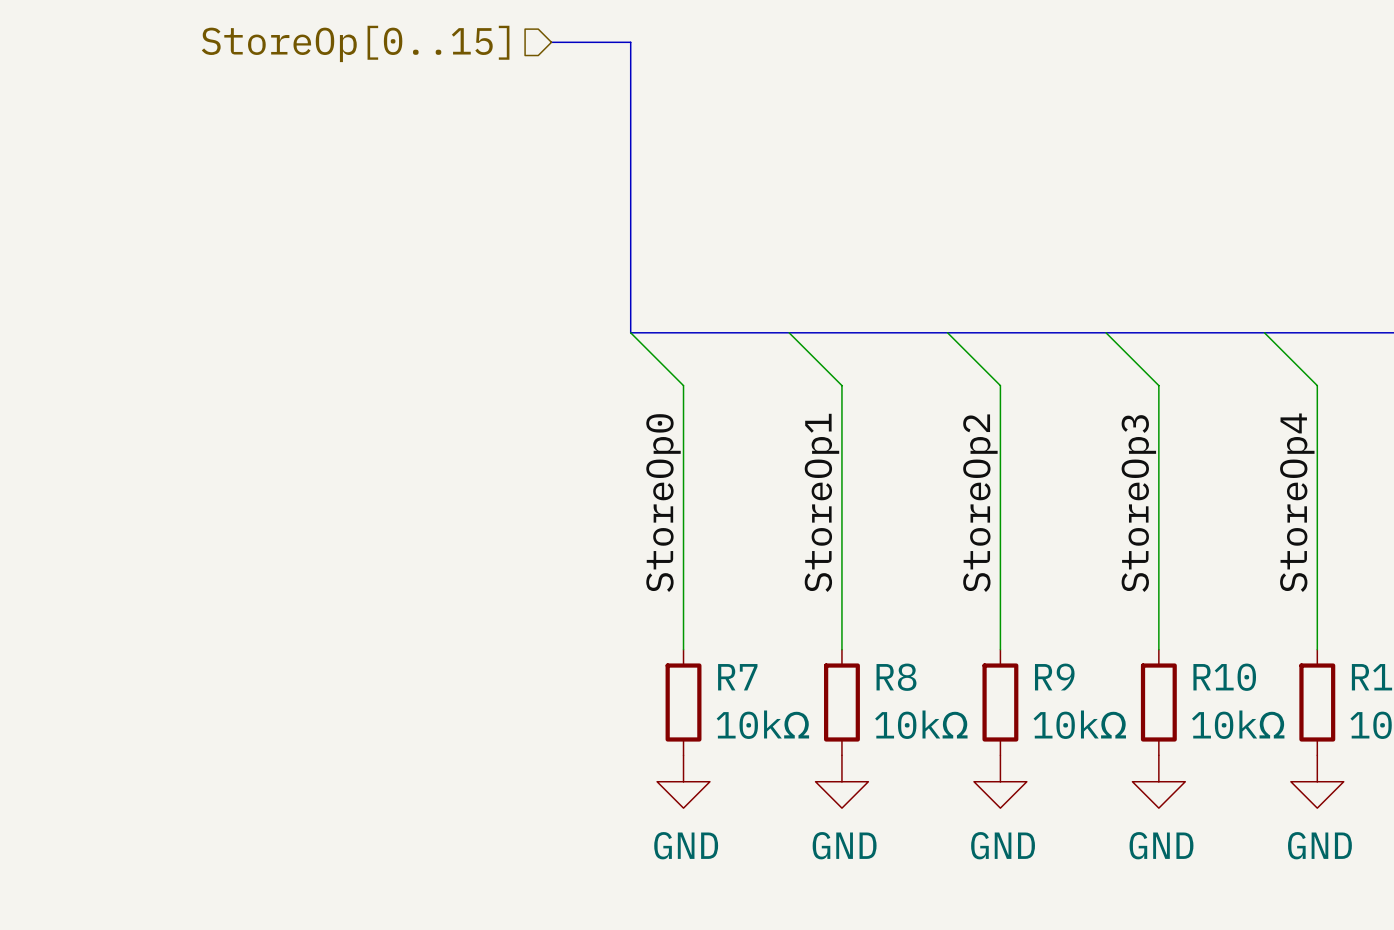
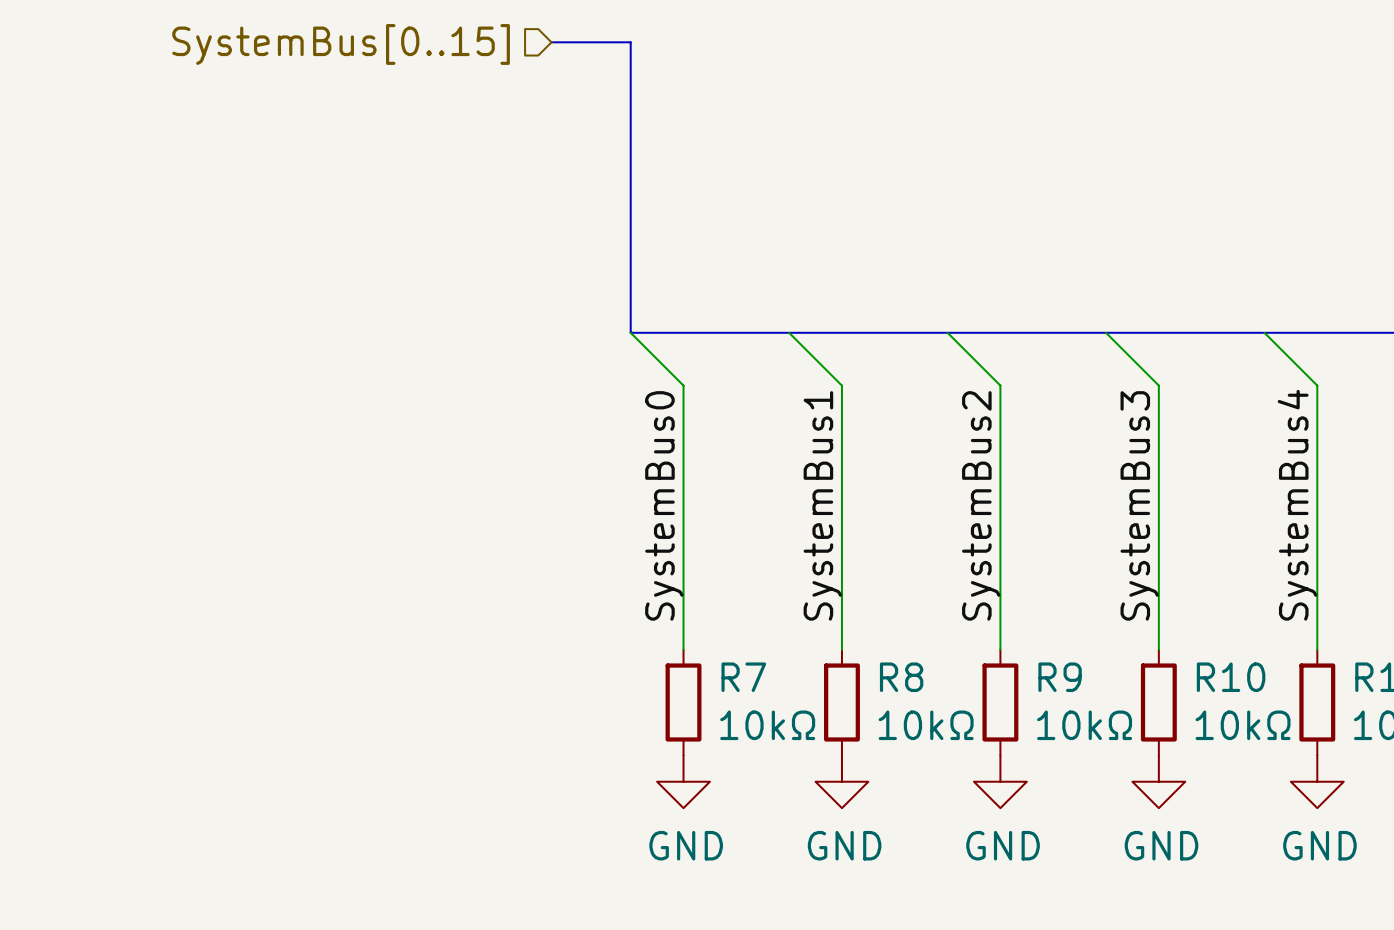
hierarchical label: StoreOp[0..15] (355, 43) -> SystemBus[0..15] (341, 44)
label: none -> SystemBus4 (1297, 505)
label: none -> SystemBus0 (664, 505)
label: none -> SystemBus1 (822, 505)
label: none -> SystemBus2 (981, 505)
label: none -> SystemBus3 (1139, 505)
label: StoreOp1 (821, 502) -> none
label: StoreOp4 (1297, 502) -> none
label: StoreOp0 (663, 503) -> none
label: StoreOp2 (980, 503) -> none
label: StoreOp3 (1138, 503) -> none

